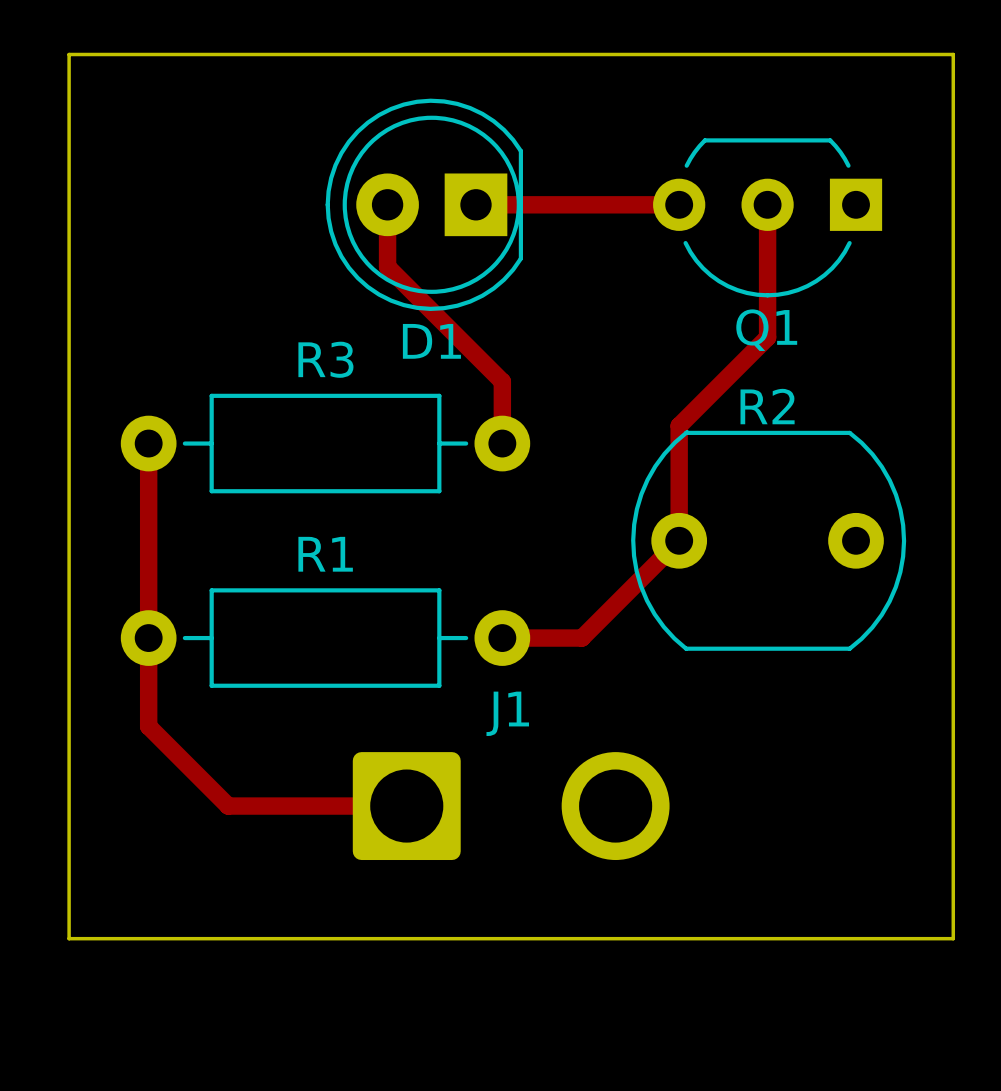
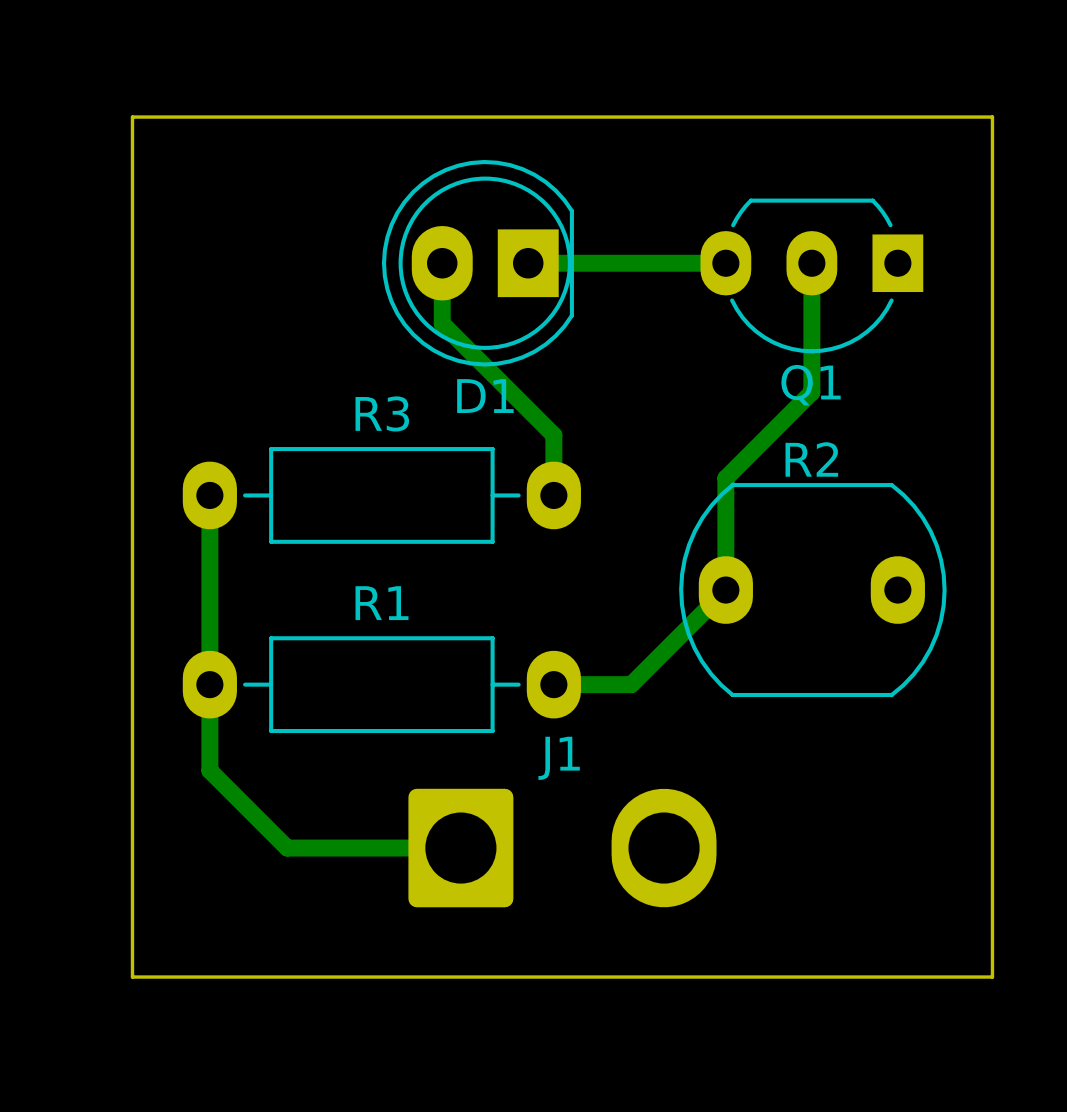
D1 footprint: [325, 98, 523, 311] -> [381, 159, 574, 367]
Q1 footprint: [653, 138, 883, 298] -> [700, 198, 924, 354]
top track: (387, 204) (387, 266) (502, 381) (502, 443) -> none
bottom track: none -> (442, 263) (442, 323) (553, 435) (553, 495)
top track: (475, 204) (679, 204) -> none
bottom track: none -> (528, 263) (725, 263)
top track: (767, 204) (767, 337) (679, 425) (679, 540) (581, 638) (502, 638) -> none
bottom track: none -> (811, 263) (811, 392) (725, 478) (725, 590) (631, 684) (553, 684)
R3 footprint: [120, 393, 531, 494] -> [182, 447, 581, 544]
R2 footprint: [631, 430, 907, 652] -> [679, 482, 947, 698]
top track: (148, 443) (148, 726) (228, 806) (406, 806) -> none
bottom track: none -> (209, 495) (209, 770) (287, 848) (460, 848)
R1 footprint: [120, 588, 531, 688] -> [182, 636, 581, 734]
J1 footprint: [352, 752, 670, 861] -> [408, 788, 717, 908]

